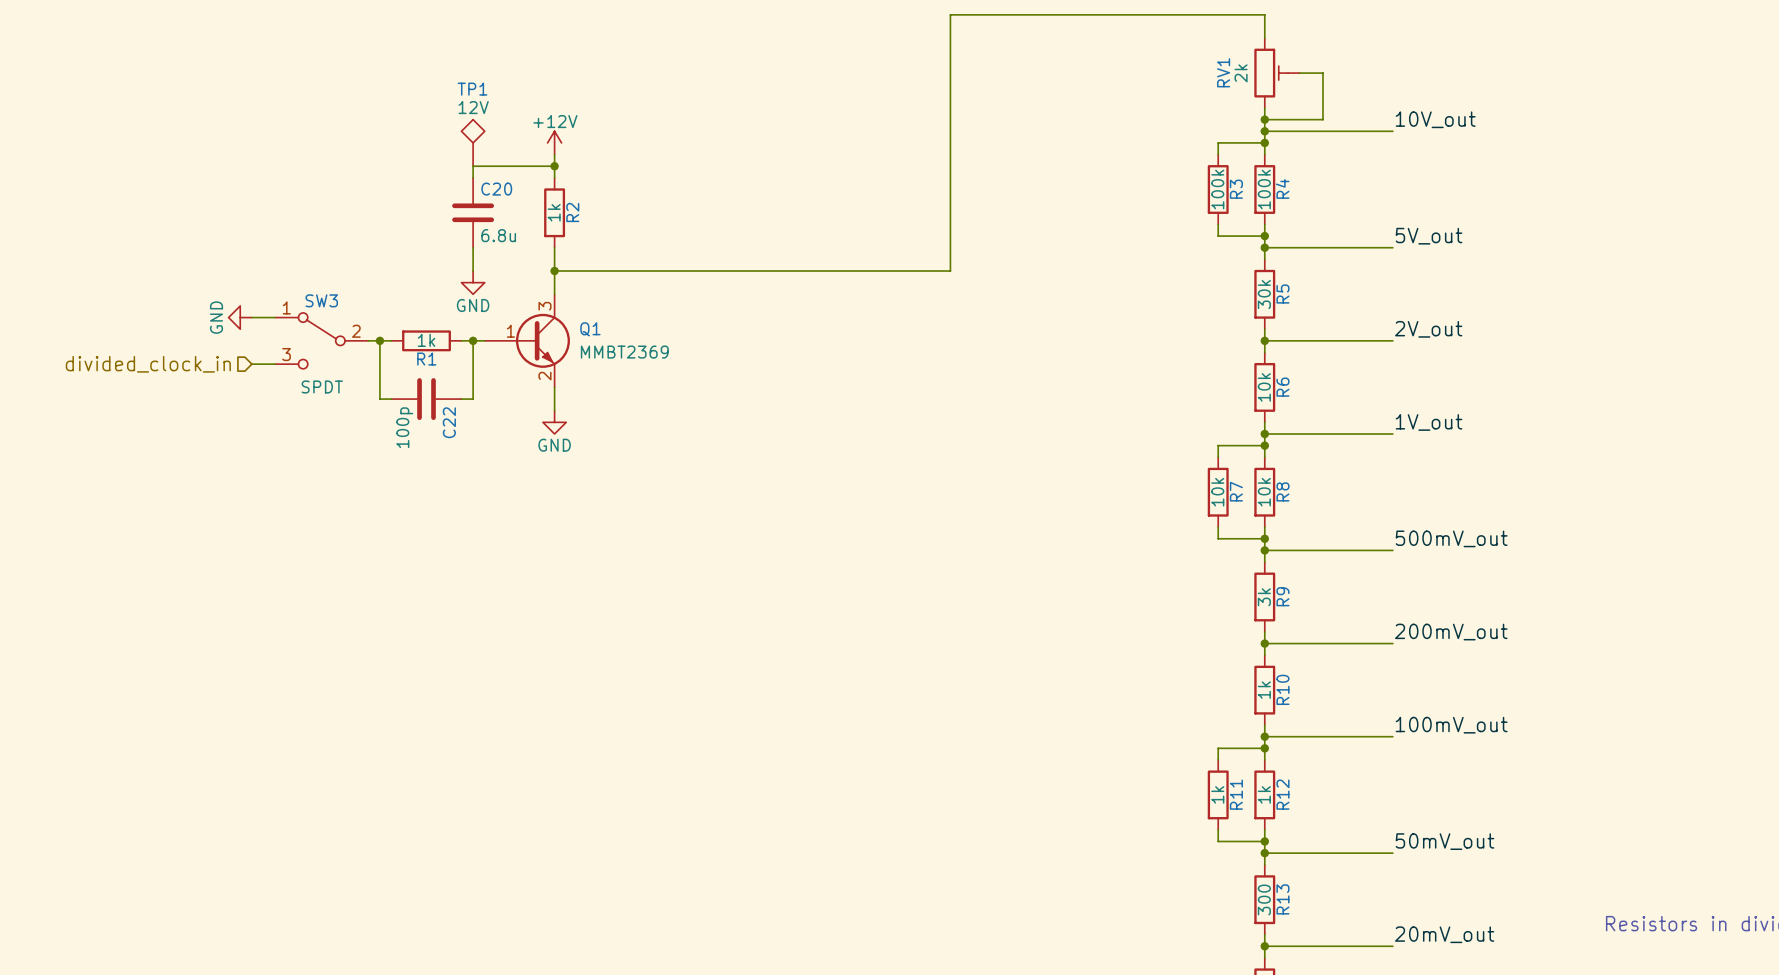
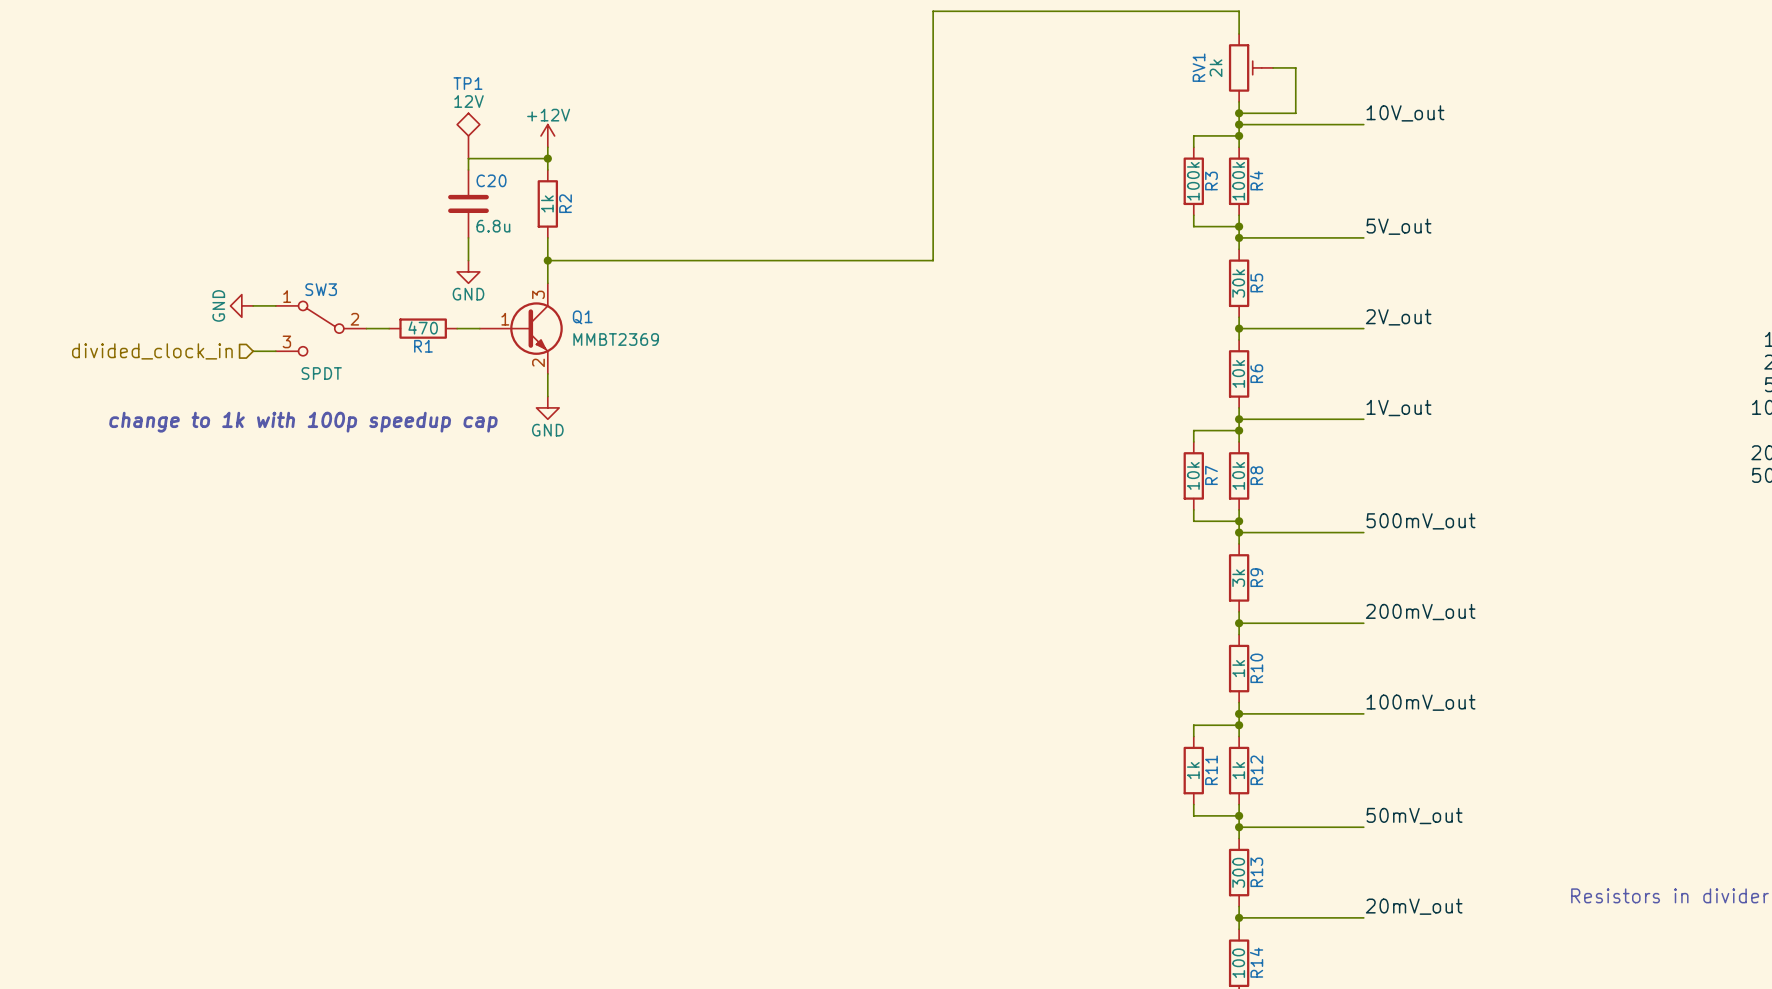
wire: (379, 340) (379, 399) (391, 399) -> none
junction: (379, 340) -> none
R1 value: 1k (426, 340) -> 470 (423, 327)
wire: (473, 340) (473, 399) (461, 399) -> none
junction: (473, 340) -> none
C22: 100p (426, 399) -> none
text: none -> change to 1k with 100p speedup cap (303, 422)

